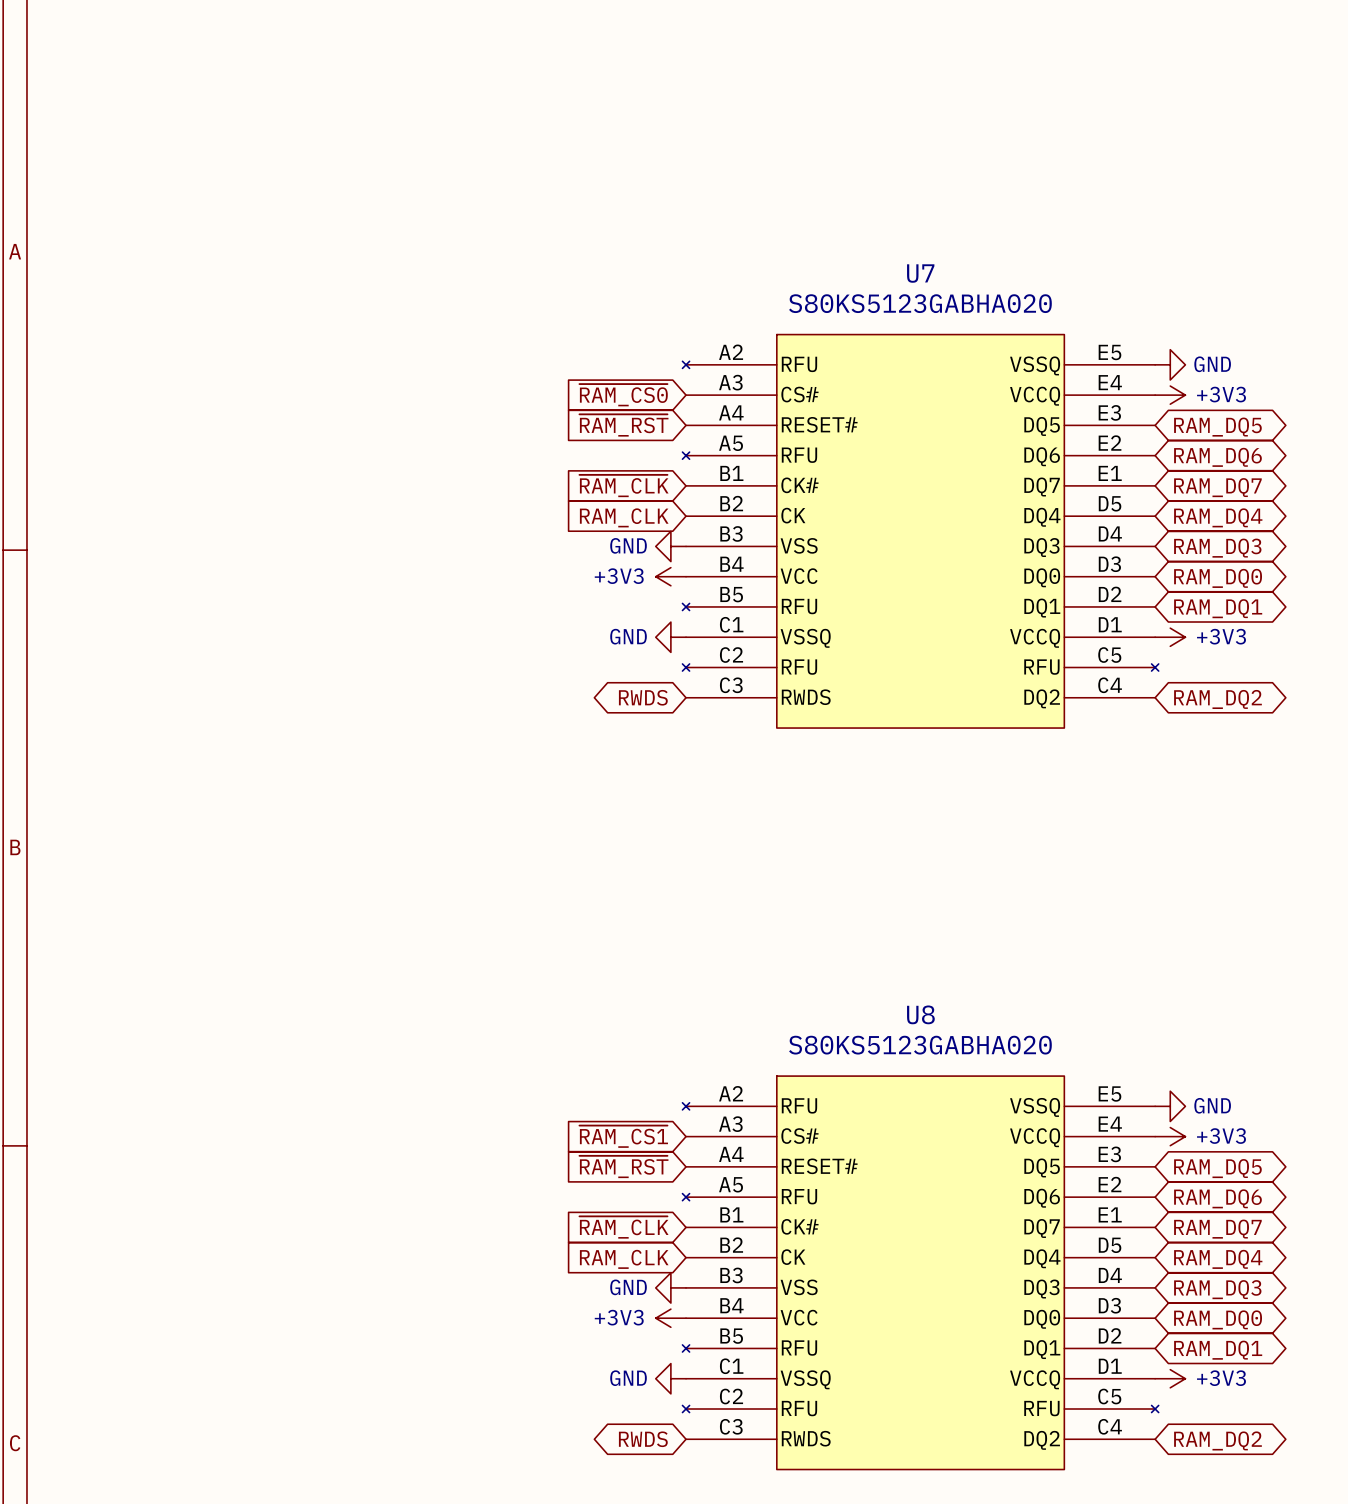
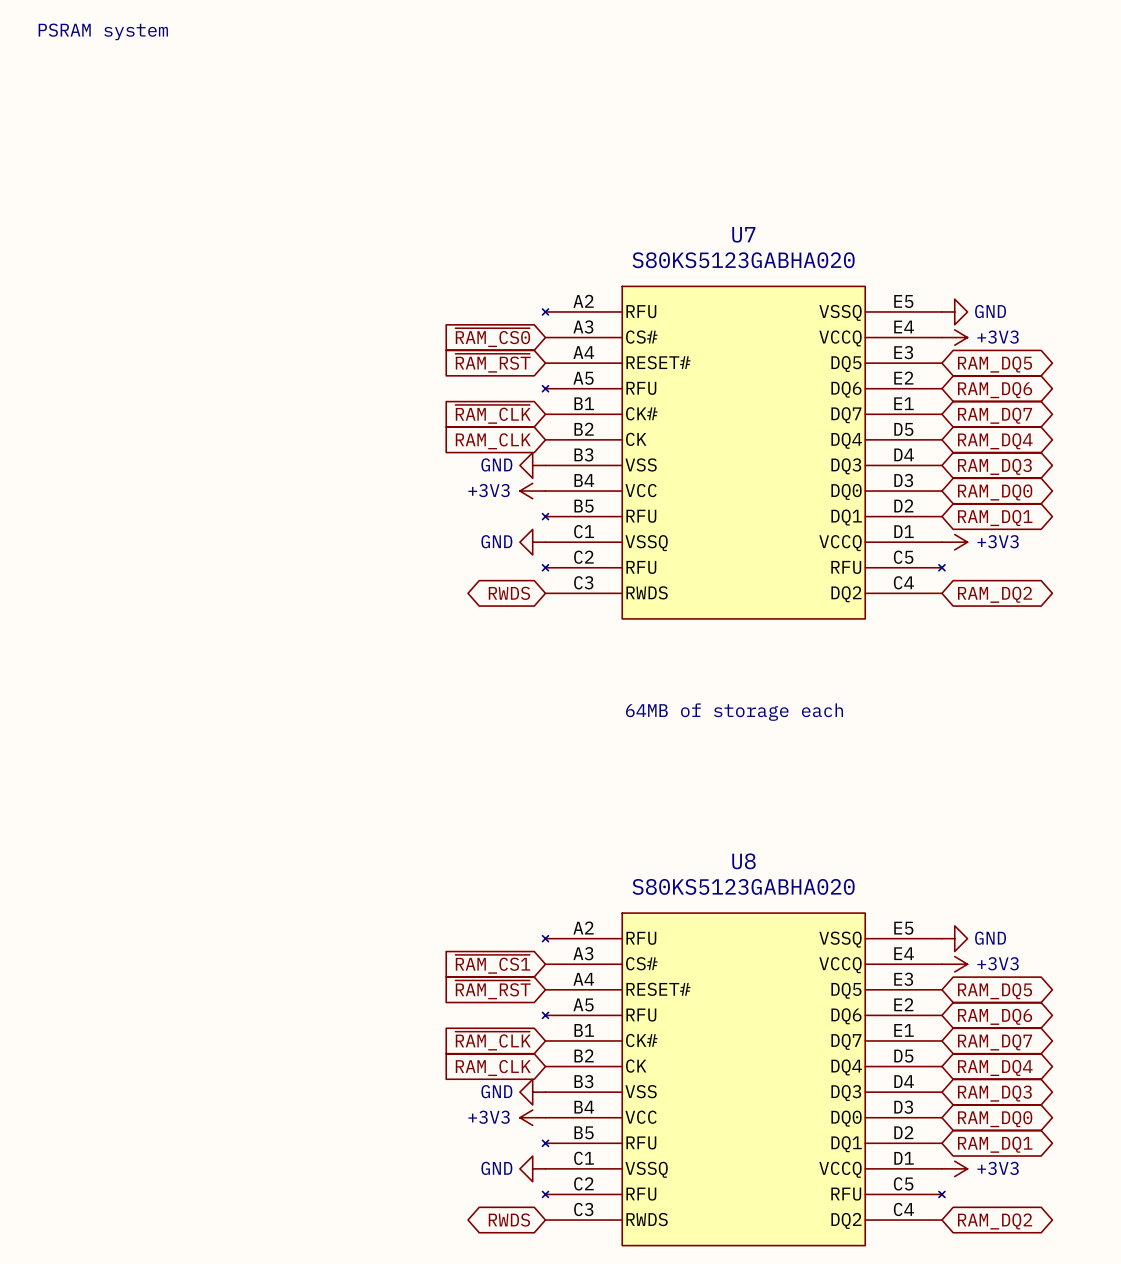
text: none -> PSRAM system (103, 31)
text: none -> 64MB of storage each (734, 712)

